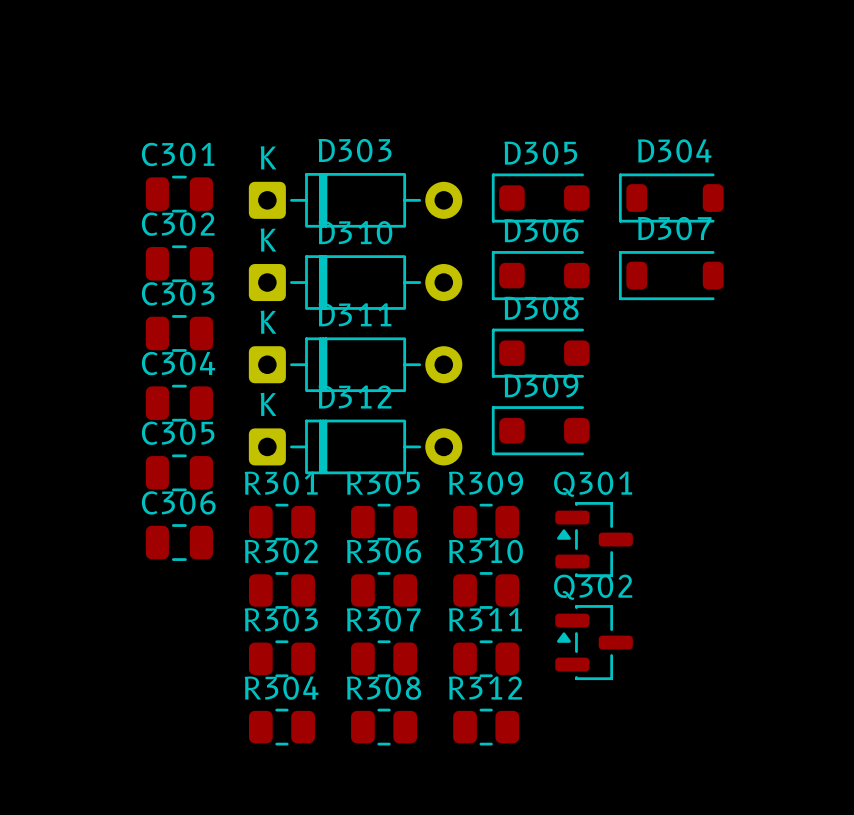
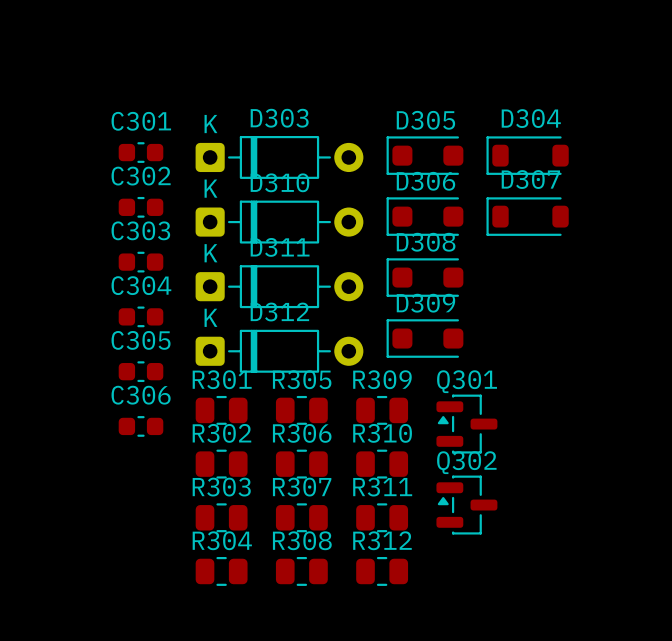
C301 footprint: [145, 175, 213, 213] -> [118, 142, 164, 163]
C302 footprint: [145, 245, 213, 283] -> [118, 196, 164, 218]
C303 footprint: [145, 315, 213, 352] -> [118, 251, 164, 273]
C304 footprint: [145, 384, 213, 422] -> [118, 306, 164, 328]
C305 footprint: [145, 454, 213, 492] -> [118, 361, 164, 383]
C306 footprint: [145, 524, 213, 561] -> [118, 416, 164, 437]

